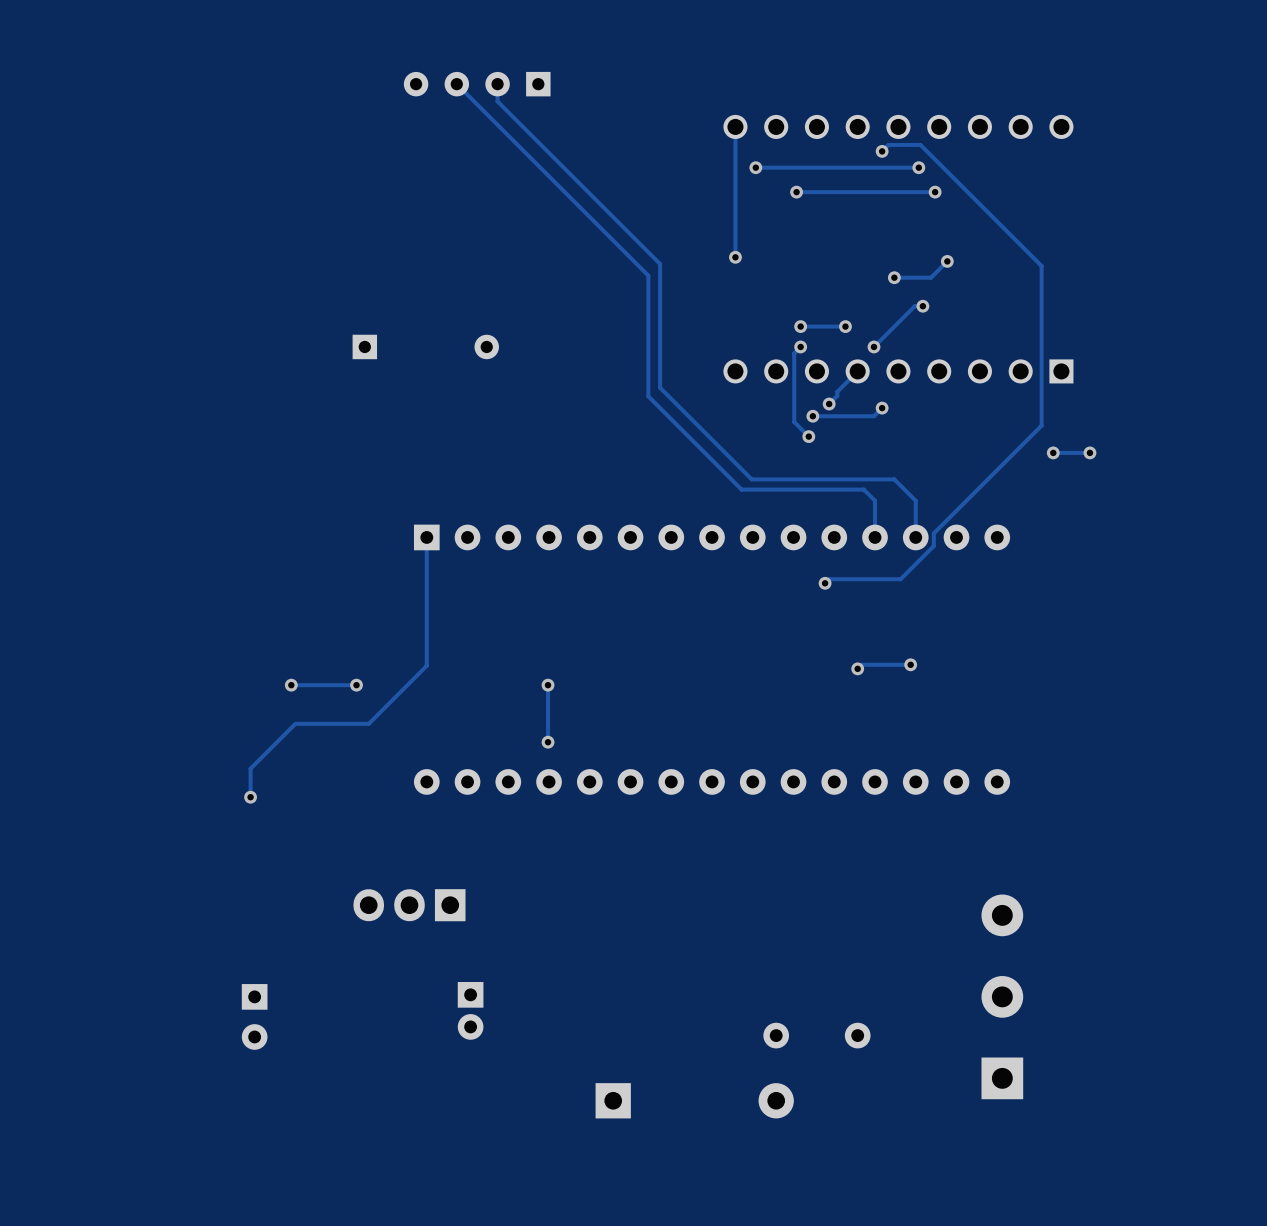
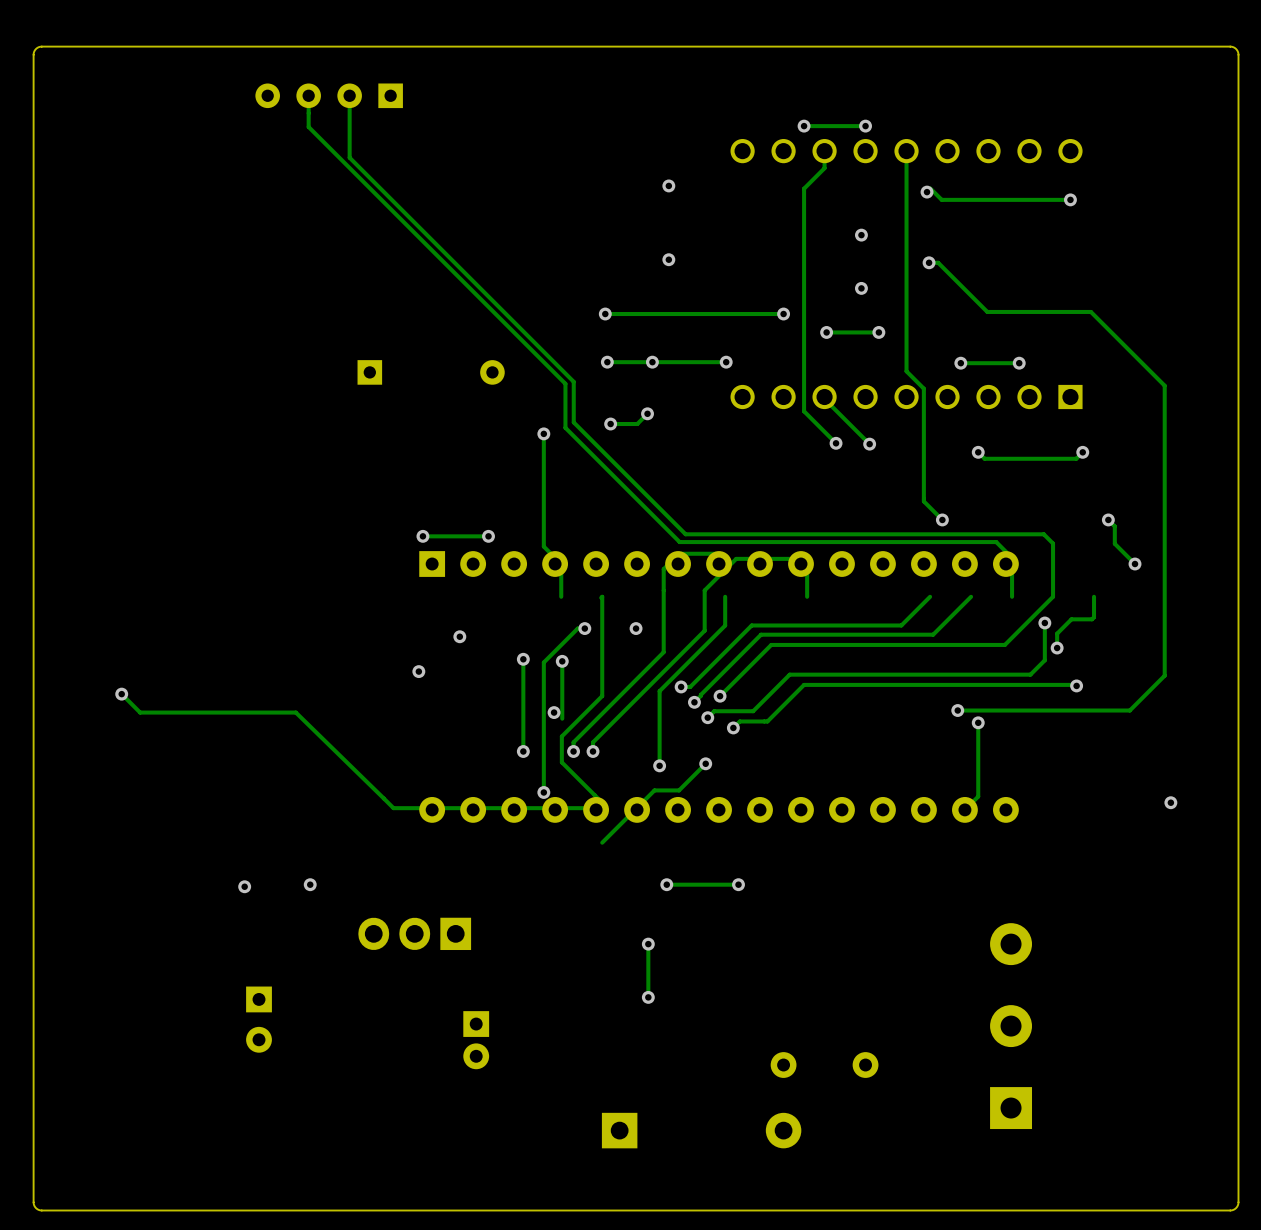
board edge: none -> (1230, 46) (41, 46) (36, 49) (33, 54) (33, 1202) (36, 1208) (41, 1210) (1230, 1210) (1236, 1208) (1238, 1202) (1238, 54) (1236, 49) (1230, 46)
track: none -> (308, 95) (308, 127) (565, 383) (565, 427) (679, 542) (996, 542) (1012, 557) (1012, 596)
track: none -> (349, 95) (349, 157) (573, 381) (573, 422) (685, 534) (1043, 534) (1053, 543) (1053, 596) (1004, 644) (771, 644) (720, 696)
track: (456, 84) (648, 275) (648, 396) (741, 489) (863, 489) (875, 500) (875, 537) -> none
part position: (477, 84) -> (329, 95)
track: (497, 84) (497, 101) (660, 263) (660, 387) (751, 479) (894, 479) (915, 500) (915, 537) -> none
via: none -> (804, 126)
track: none -> (865, 126) (804, 126)
via: none -> (865, 126)
track: (735, 126) (735, 257) -> none
track: none -> (824, 151) (824, 168) (804, 188) (804, 411) (836, 443)
track: none -> (906, 151) (906, 371) (923, 388) (923, 501) (942, 519)
track: (882, 151) (888, 144) (920, 144) (1041, 266) (1041, 425) (933, 533) (933, 546) (900, 579) (829, 579) (825, 583) -> none
via: (882, 151) -> none
via: none -> (668, 185)
track: none -> (930, 188) (941, 199) (1070, 199)
via: (755, 167) -> none
track: (918, 167) (755, 167) -> none
via: none -> (1070, 199)
via: (796, 192) -> none
track: (935, 192) (796, 192) -> none
via: (935, 192) -> none
via: none -> (861, 235)
via: none -> (668, 259)
track: none -> (929, 262) (938, 262) (987, 311) (1090, 311) (1164, 385) (1164, 675) (1129, 710) (957, 710)
via: none -> (929, 262)
via: (735, 257) -> none
track: (947, 261) (931, 277) (894, 277) -> none
via: (947, 261) -> none
via: none -> (861, 288)
via: (894, 277) -> none
via: none -> (605, 314)
track: none -> (783, 314) (605, 314)
via: none -> (783, 314)
track: (922, 306) (914, 306) (873, 346) -> none
via: (922, 306) -> none
via: none -> (826, 332)
track: none -> (878, 332) (826, 332)
via: none -> (878, 332)
via: (800, 326) -> none
track: (845, 326) (800, 326) -> none
via: (845, 326) -> none
via: none -> (607, 362)
via: none -> (652, 362)
track: none -> (726, 362) (607, 362)
via: none -> (726, 362)
via: none -> (960, 363)
track: none -> (1019, 363) (960, 363)
via: none -> (1019, 363)
track: (800, 346) (794, 353) (794, 422) (808, 436) -> none
via: (800, 346) -> none
via: (873, 346) -> none
track: none -> (824, 397) (869, 444)
track: (857, 371) (837, 391) (837, 395) (829, 404) -> none
track: none -> (647, 413) (637, 424) (610, 424)
via: none -> (647, 413)
via: none -> (610, 424)
via: (829, 404) -> none
track: none -> (543, 433) (543, 546) (561, 564) (561, 596)
via: none -> (543, 433)
track: (882, 408) (873, 416) (812, 416) -> none
via: (882, 408) -> none
via: (812, 416) -> none
via: none -> (836, 443)
via: none -> (869, 444)
via: none -> (978, 452)
track: none -> (1082, 452) (1076, 458) (984, 458) (978, 452)
via: none -> (1082, 452)
via: (808, 436) -> none
via: (1053, 452) -> none
track: (1089, 452) (1053, 452) -> none
via: (1089, 452) -> none
via: none -> (942, 519)
track: none -> (1108, 519) (1114, 526) (1114, 543) (1135, 564)
via: none -> (1108, 519)
via: none -> (422, 536)
via: none -> (488, 536)
track: none -> (716, 553) (679, 553) (663, 569) (663, 652) (573, 742) (573, 751)
track: (426, 537) (426, 665) (368, 723) (295, 723) (250, 768) (250, 797) -> none
via: none -> (1135, 564)
track: none -> (725, 596) (725, 625) (659, 691) (659, 765)
track: none -> (807, 596) (807, 564) (802, 558) (736, 558) (704, 590) (704, 630) (593, 742) (593, 751)
track: none -> (930, 596) (901, 625) (751, 625) (690, 686) (681, 686)
track: none -> (971, 596) (933, 634) (761, 634) (694, 702)
track: none -> (1094, 596) (1094, 617) (1091, 619) (1071, 619) (1057, 633) (1057, 648)
track: none -> (601, 597) (602, 696) (561, 736) (561, 762) (601, 801) (594, 808) (393, 808) (295, 712) (140, 712) (121, 694)
via: (825, 583) -> none
track: none -> (1044, 623) (1044, 660) (1030, 674) (789, 674) (753, 711) (714, 711) (707, 717)
via: none -> (1044, 623)
track: none -> (584, 628) (577, 628) (543, 662) (543, 792)
via: none -> (584, 628)
via: none -> (636, 628)
via: none -> (459, 636)
via: none -> (1057, 648)
track: none -> (523, 659) (523, 751)
via: none -> (523, 659)
via: none -> (562, 661)
via: none -> (418, 671)
track: none -> (1076, 685) (804, 684) (767, 721) (739, 721) (733, 727)
via: none -> (1076, 685)
via: none -> (681, 686)
track: (910, 664) (861, 664) (857, 668) -> none
via: (910, 664) -> none
via: none -> (121, 694)
via: none -> (720, 696)
via: (857, 668) -> none
via: none -> (694, 702)
via: none -> (957, 710)
via: (291, 685) -> none
track: (356, 685) (291, 685) -> (488, 536) (422, 536)
via: (356, 685) -> none
track: (548, 685) (548, 742) -> (562, 661) (562, 718)
via: none -> (707, 717)
track: none -> (978, 722) (978, 796) (972, 802)
via: none -> (978, 722)
via: none -> (733, 727)
via: none -> (523, 751)
via: none -> (573, 751)
via: none -> (593, 751)
track: none -> (705, 763) (679, 790) (654, 790) (602, 842)
via: none -> (705, 763)
via: none -> (659, 765)
via: (548, 742) -> none
via: none -> (543, 792)
via: none -> (1170, 802)
via: (250, 797) -> none
via: none -> (310, 884)
via: none -> (666, 884)
track: none -> (738, 884) (666, 884)
via: none -> (738, 884)
via: none -> (244, 886)
track: none -> (648, 944) (648, 997)
via: none -> (648, 944)
via: none -> (648, 997)
part position: (254, 1016) -> (259, 1019)

